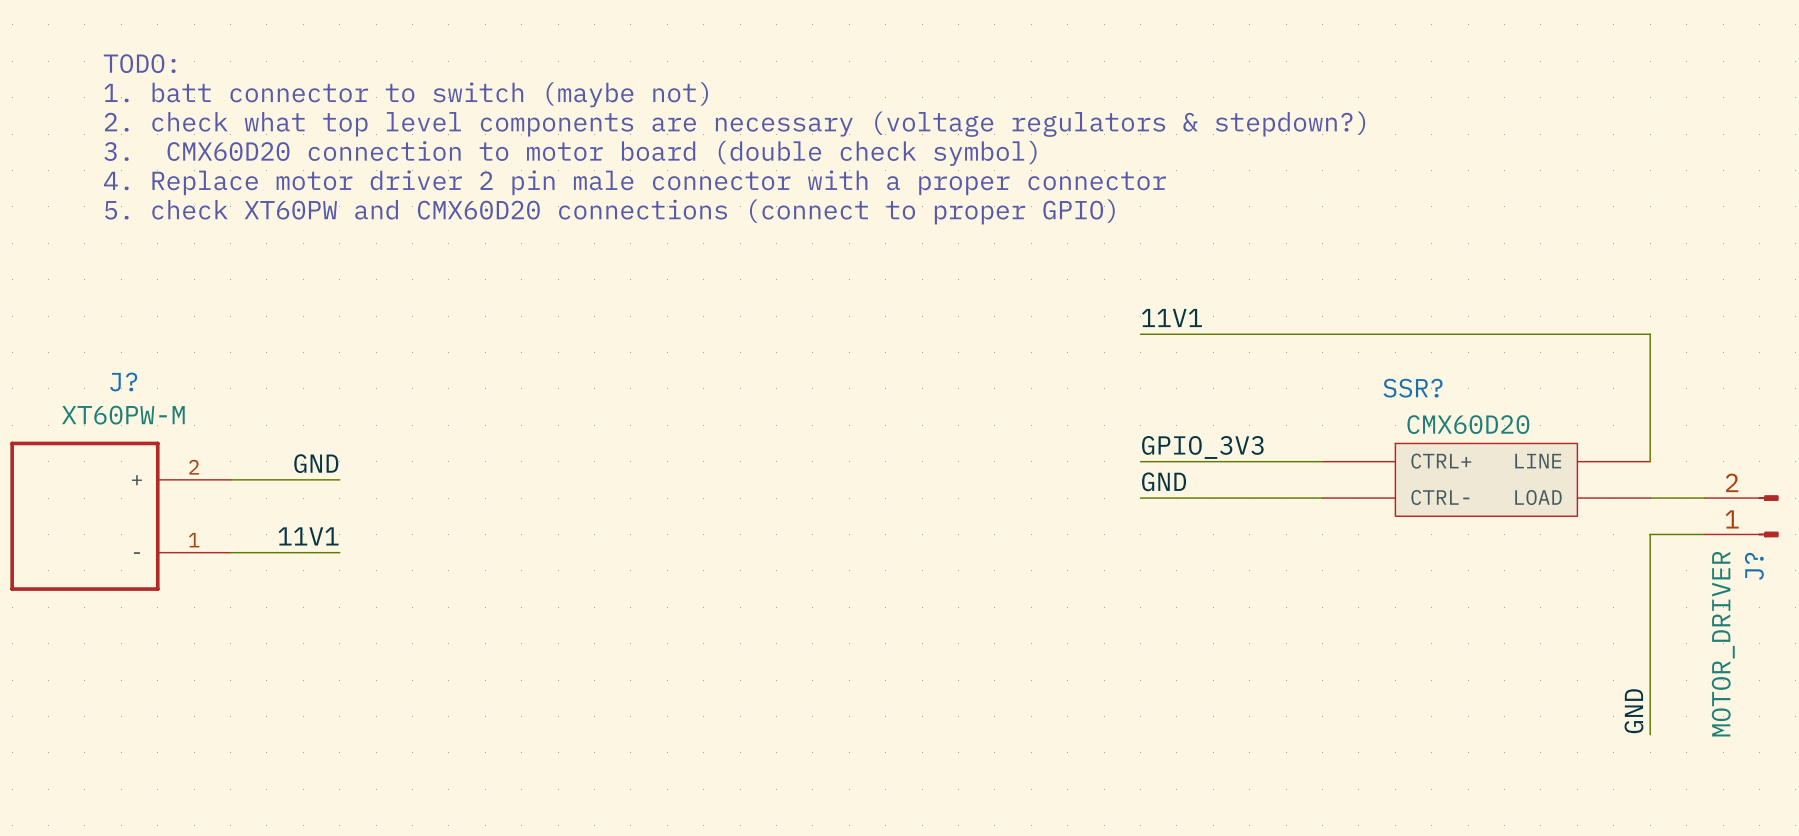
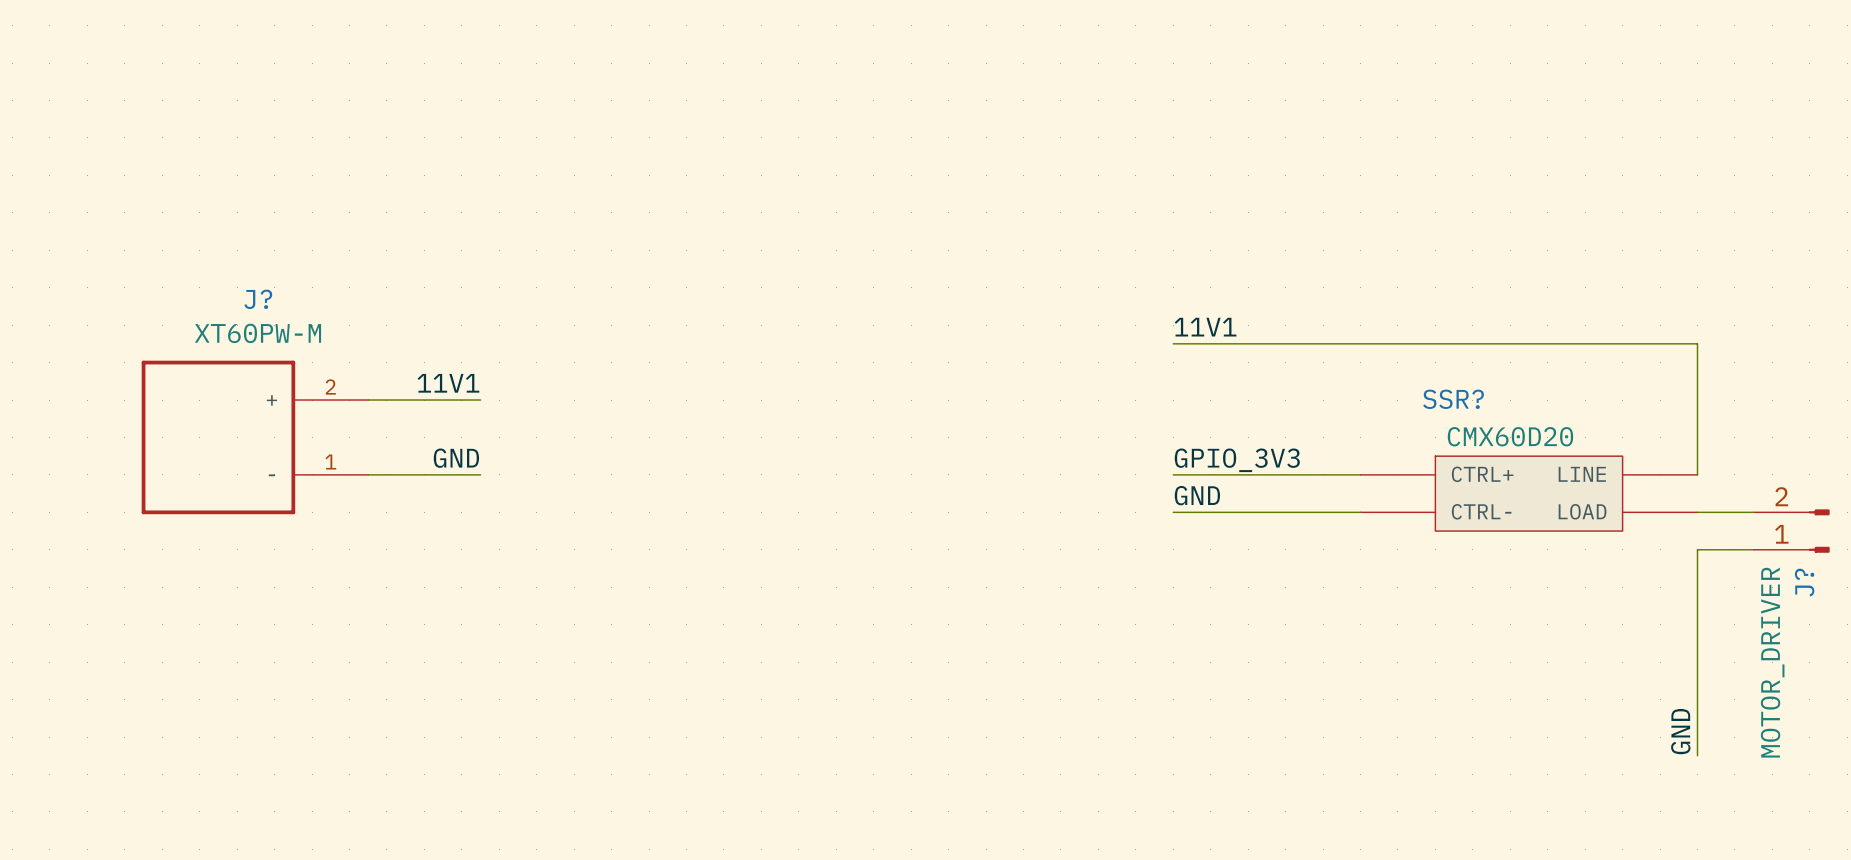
text: TODO: (139, 63) -> none
text: 1. batt connector to switch (maybe not) (406, 94) -> none
text: 2. check what top level components are necessary (voltage regulators & stepdown?) (734, 124) -> none
text: 3. CMX60D20 connection to motor board (double check symbol) (570, 153) -> none
text: 4. Replace motor driver 2 pin male connector with a proper connector (635, 182) -> none
text: 5. check XT60PW and CMX60D20 connections (connect to proper GPIO) (609, 211) -> none
label position: GND (316, 463) -> GND (456, 458)
wire: (230, 479) (339, 479) -> (368, 400) (480, 400)
J? position: (120, 516) -> (254, 437)
label position: 11V1 (308, 536) -> 11V1 (448, 383)
wire: (230, 552) (339, 552) -> (368, 474) (480, 474)

